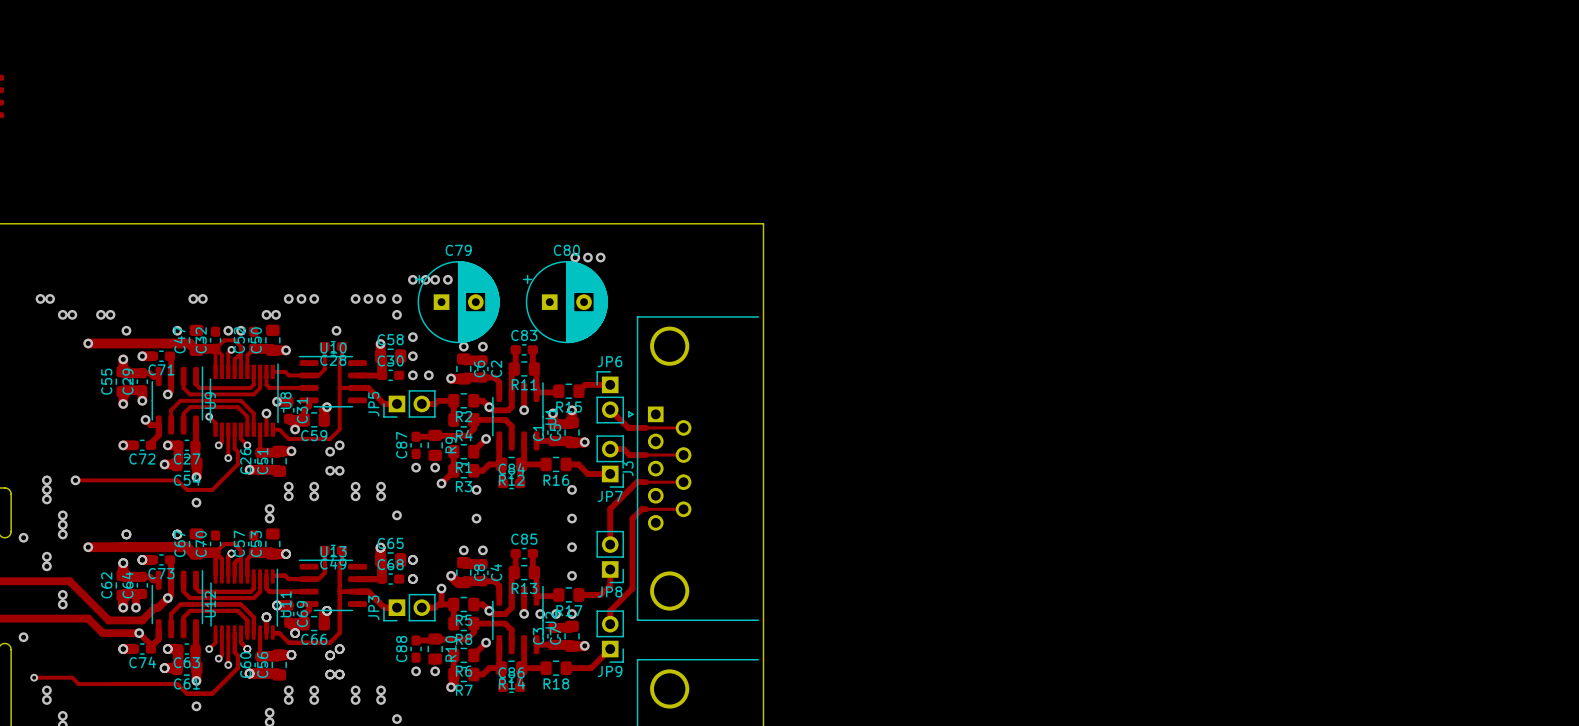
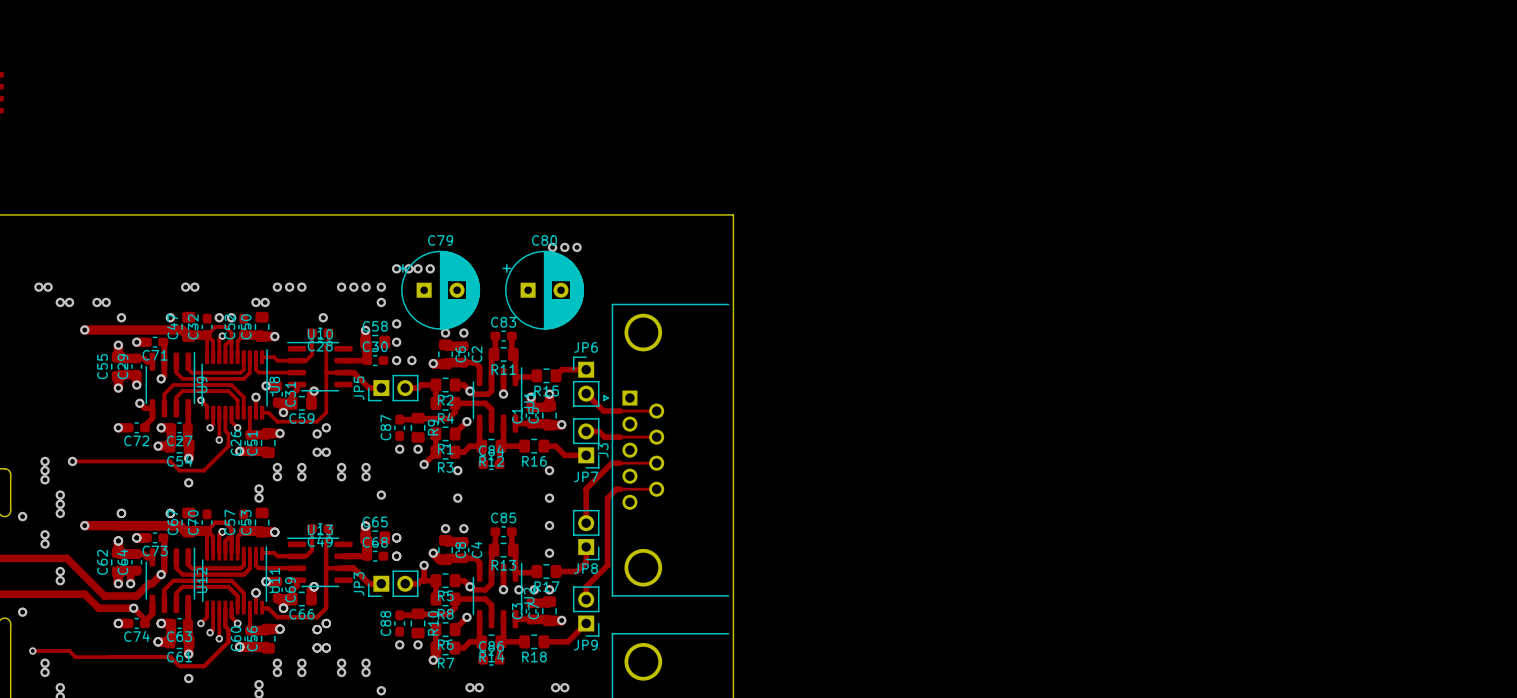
via: none -> (470, 687)
via: none -> (479, 687)
via: none -> (555, 687)
via: none -> (564, 687)

